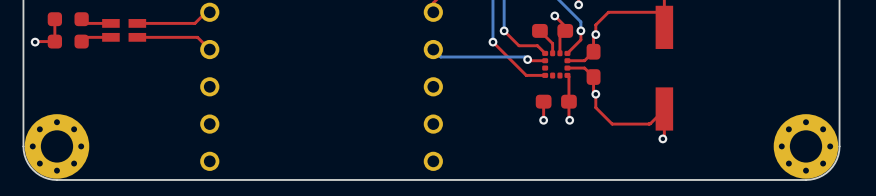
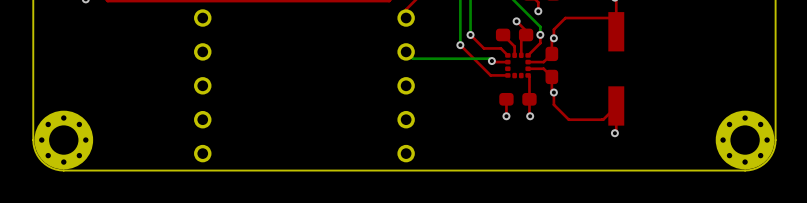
top track: (209, 12) (206, 12) (194, 23) (137, 23) -> none
top track: (54, 19) (54, 41) (35, 42) -> none
part: (68, 19) -> none
top track: (81, 19) (85, 23) (110, 23) -> none
part: (124, 30) -> none
top track: (110, 37) (85, 37) (81, 41) -> none
top track: (137, 37) (197, 37) (209, 49) -> none
part: (68, 41) -> none
via: (35, 42) -> none

